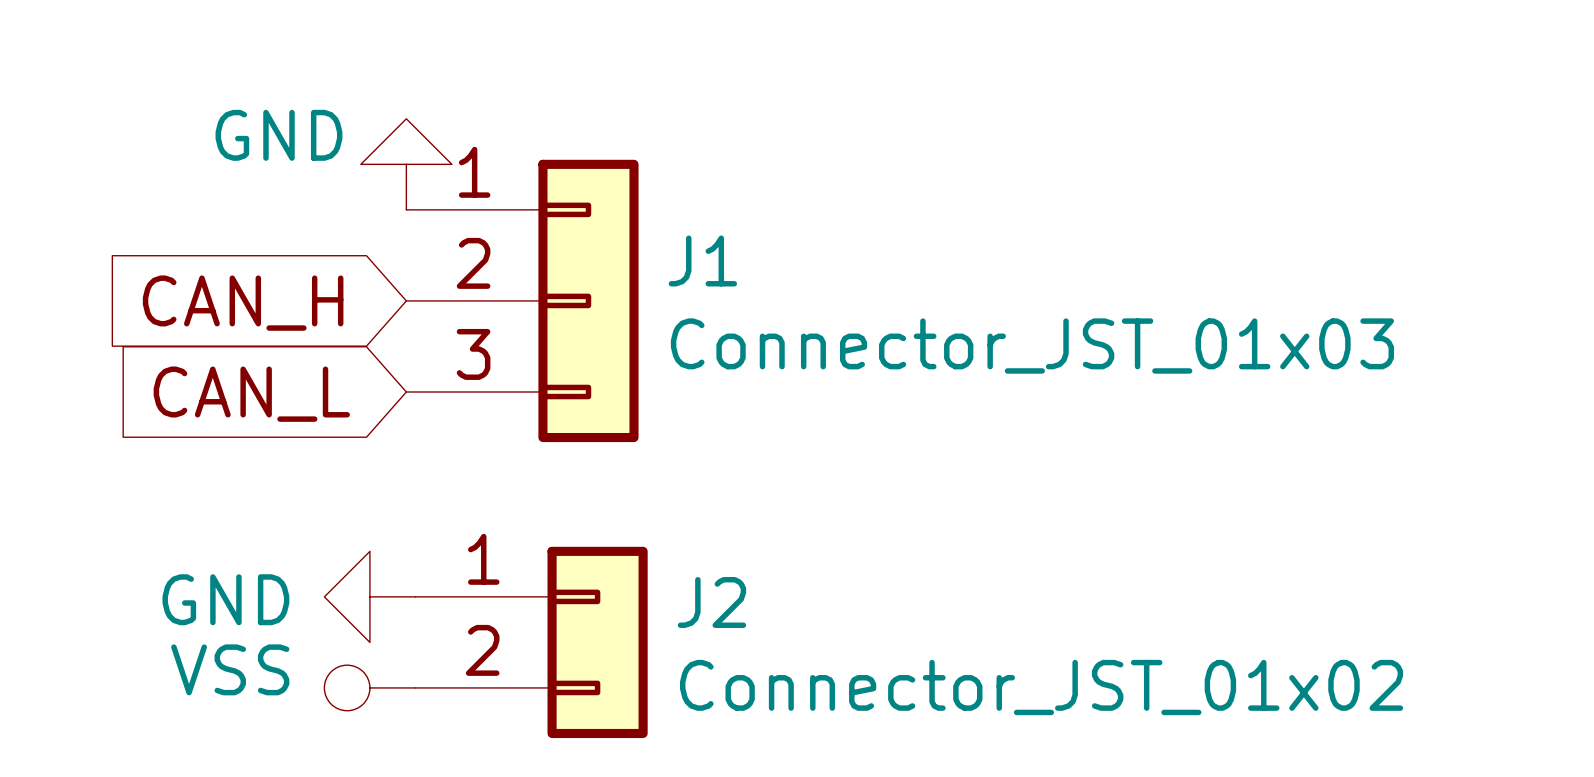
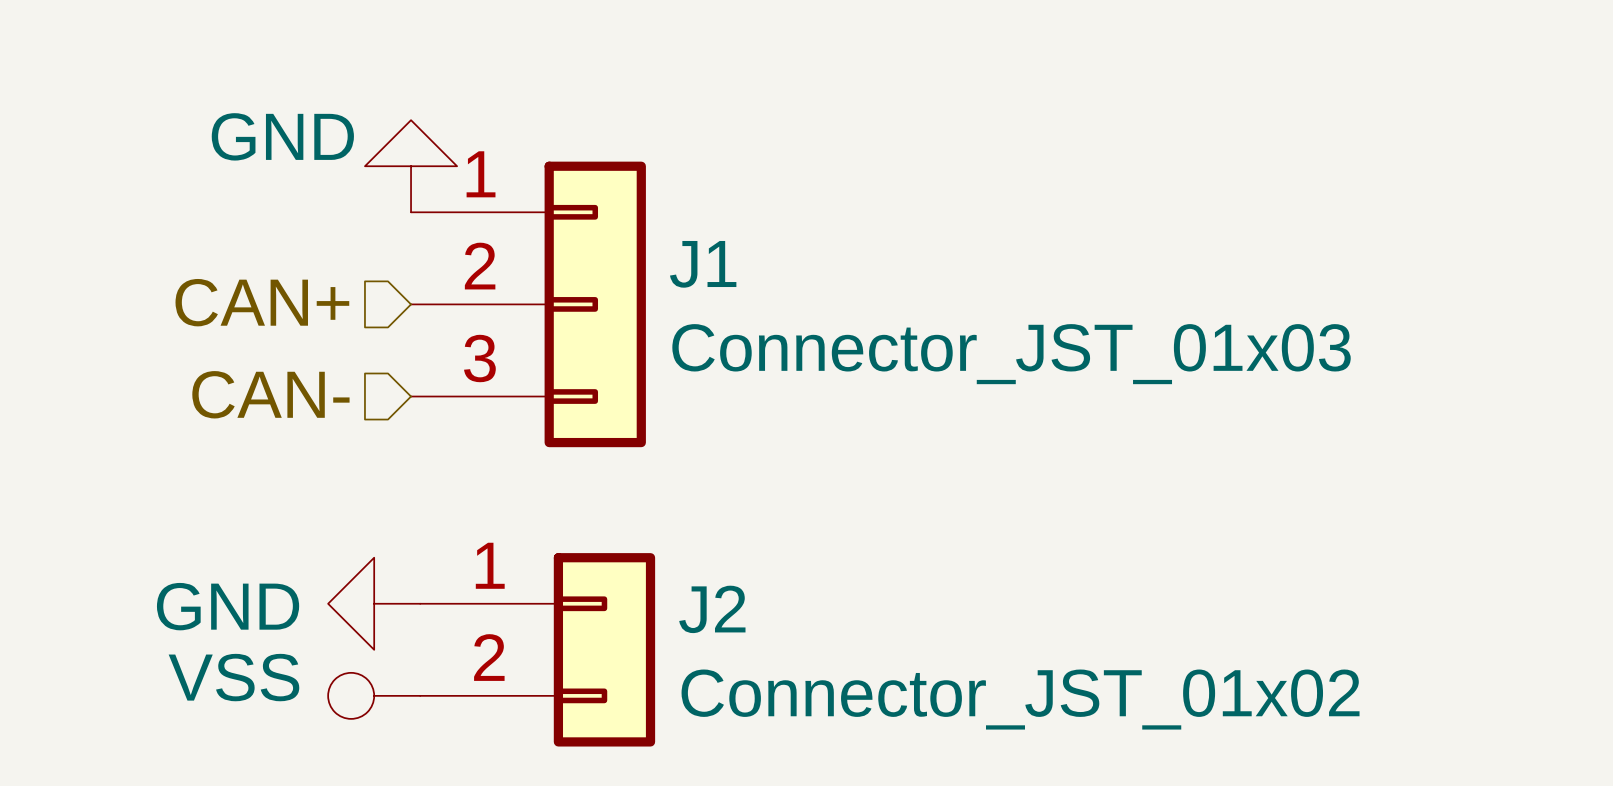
hierarchical label: none -> CAN+ (262, 302)
global label: CAN_H (243, 303) -> none
hierarchical label: none -> CAN- (270, 394)
global label: CAN_L (251, 394) -> none

